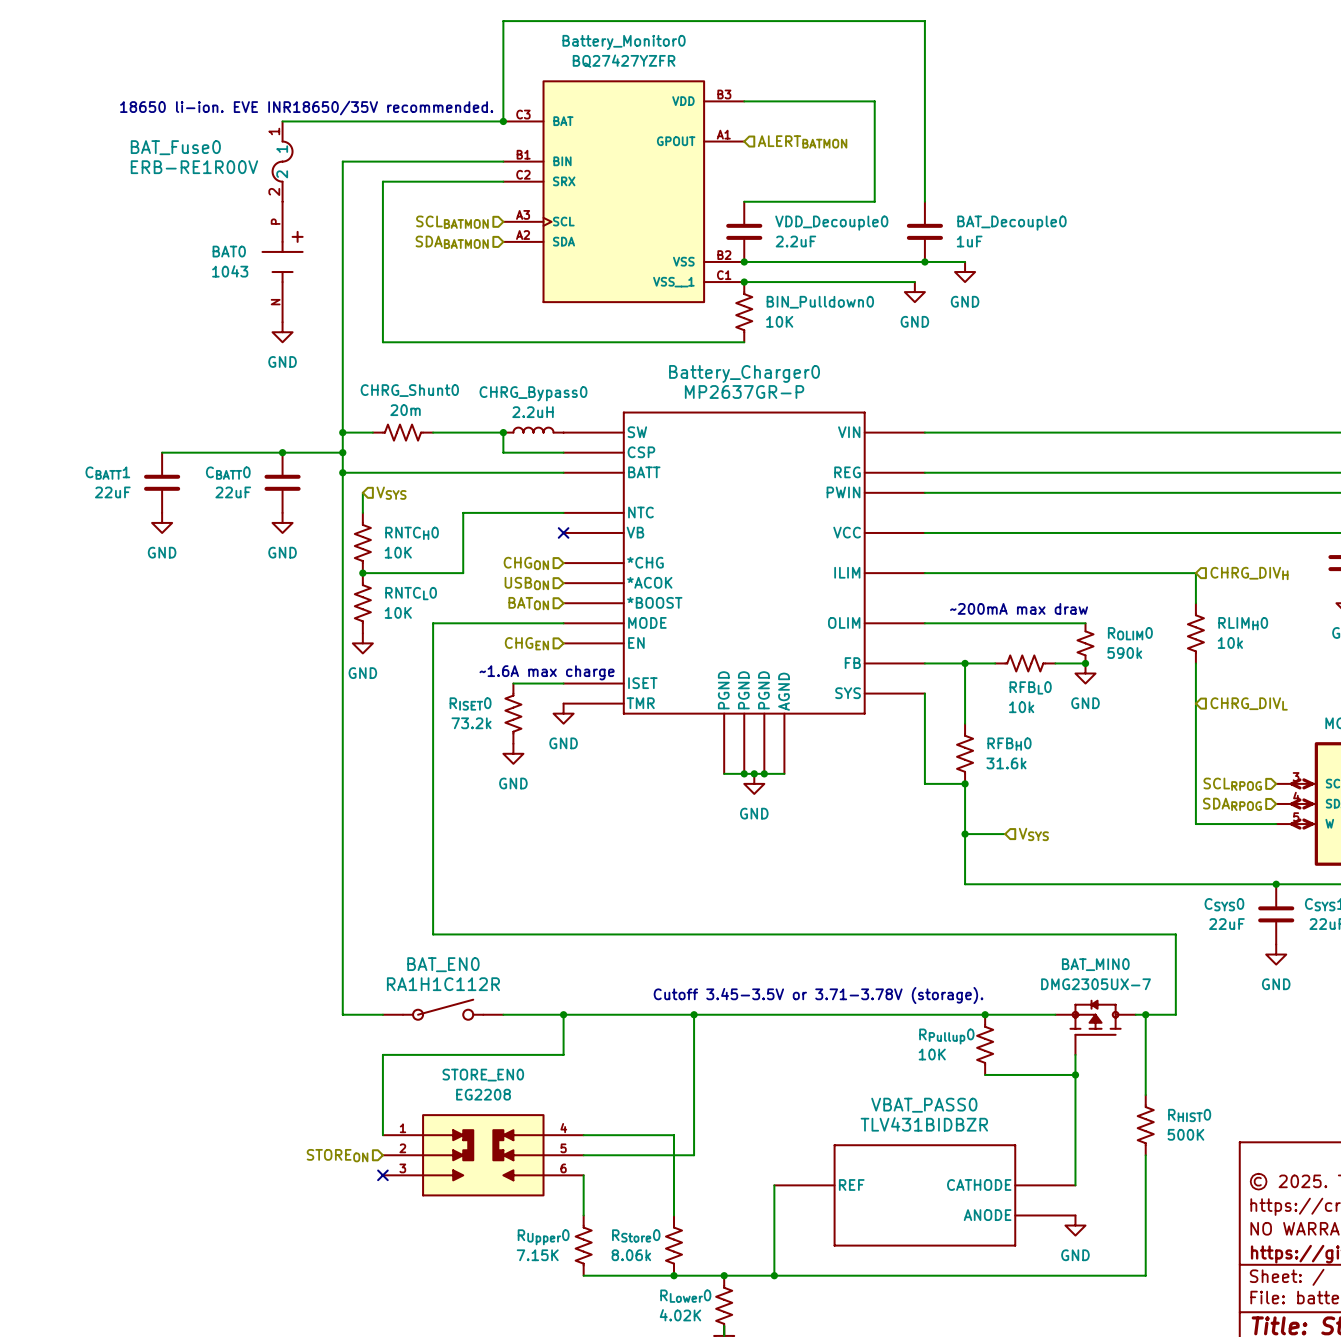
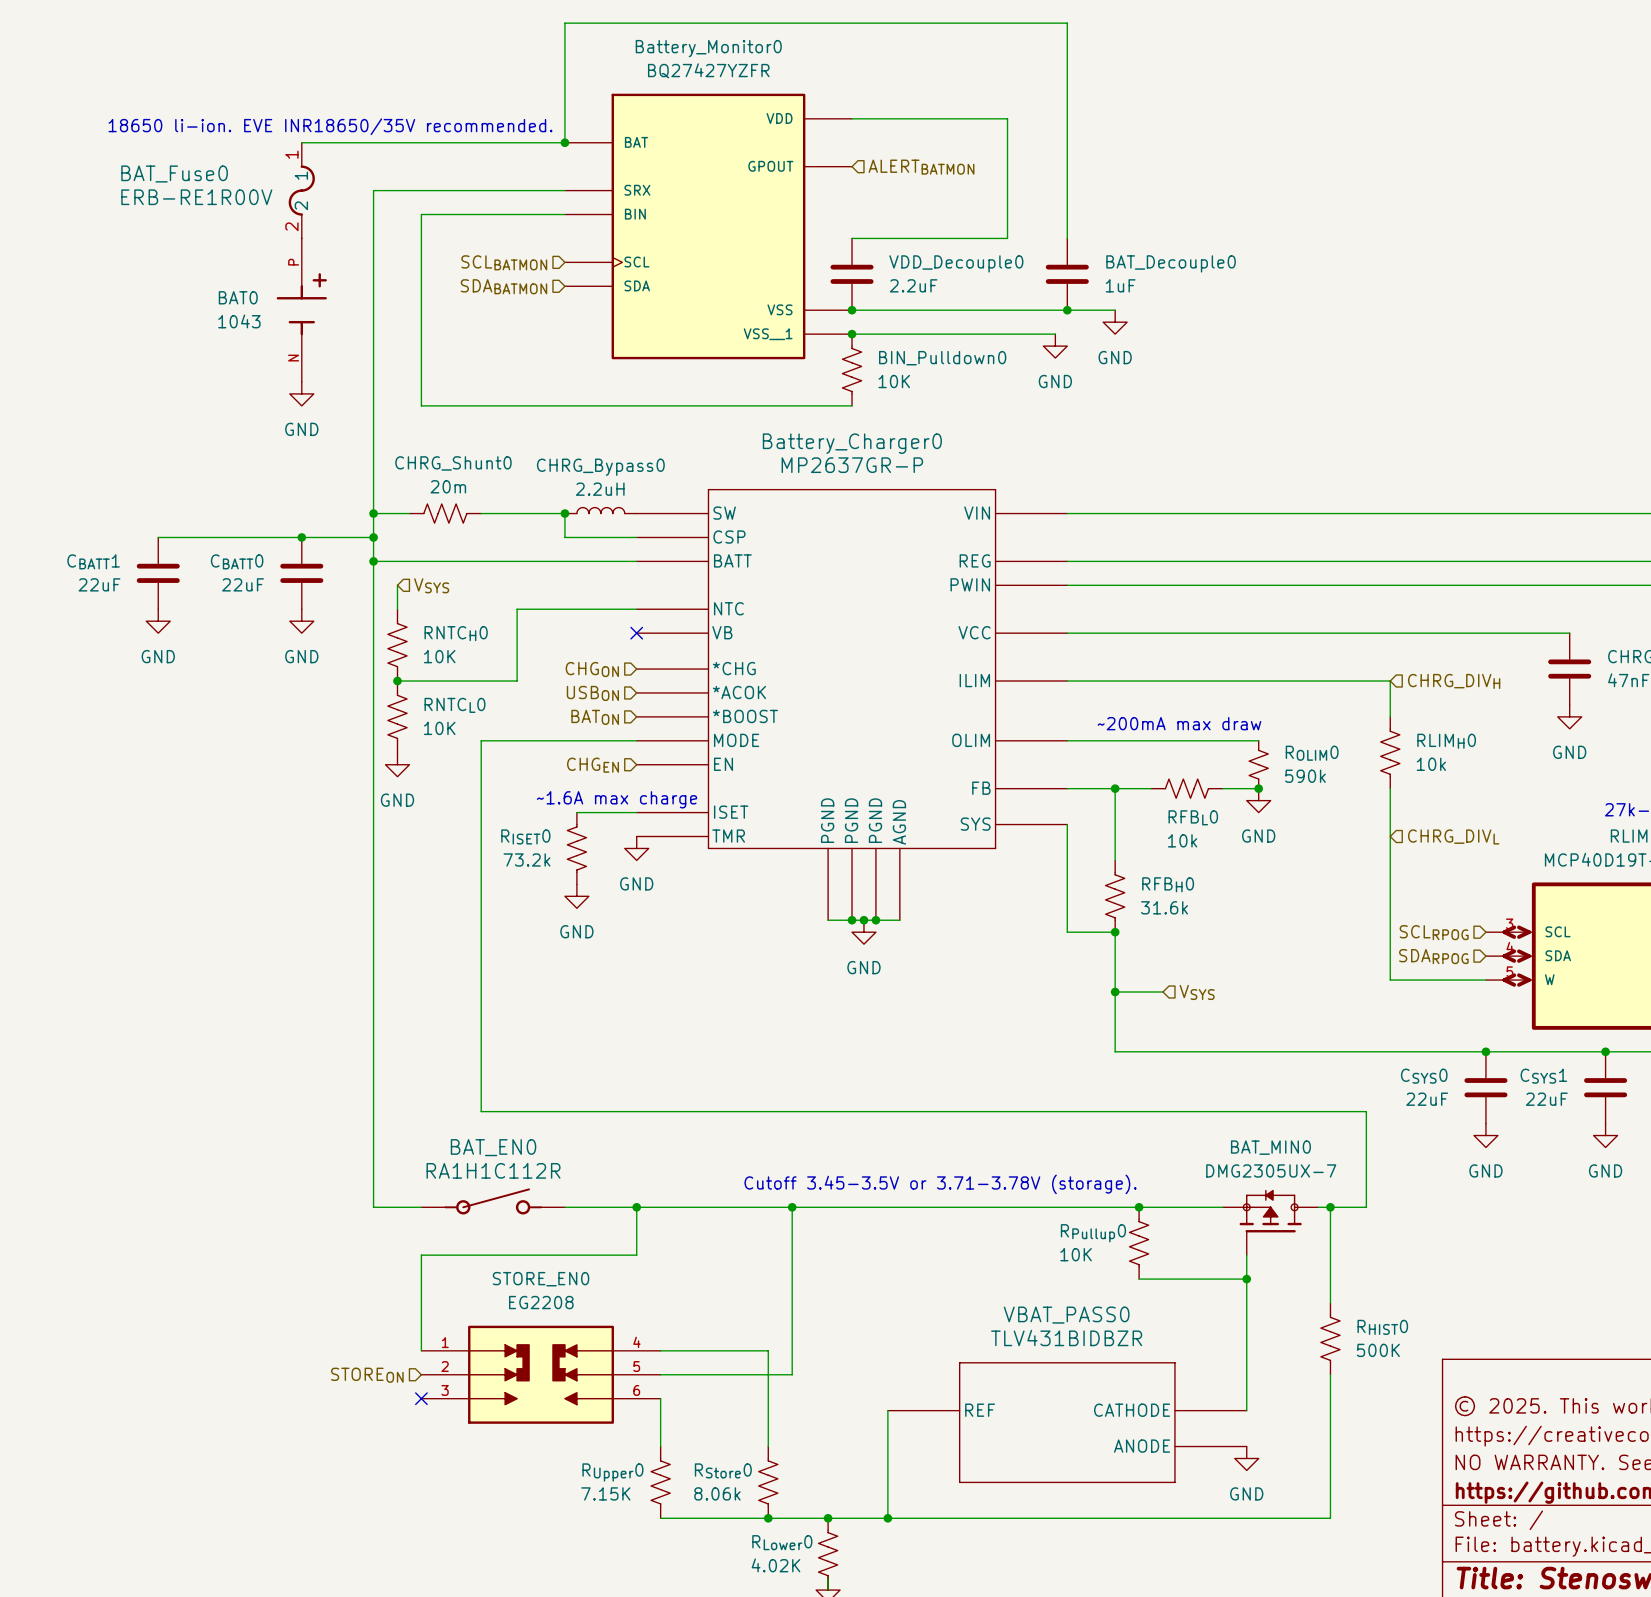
Battery_Monitor0 symbol: [503, 80, 745, 304] -> [564, 93, 853, 360]

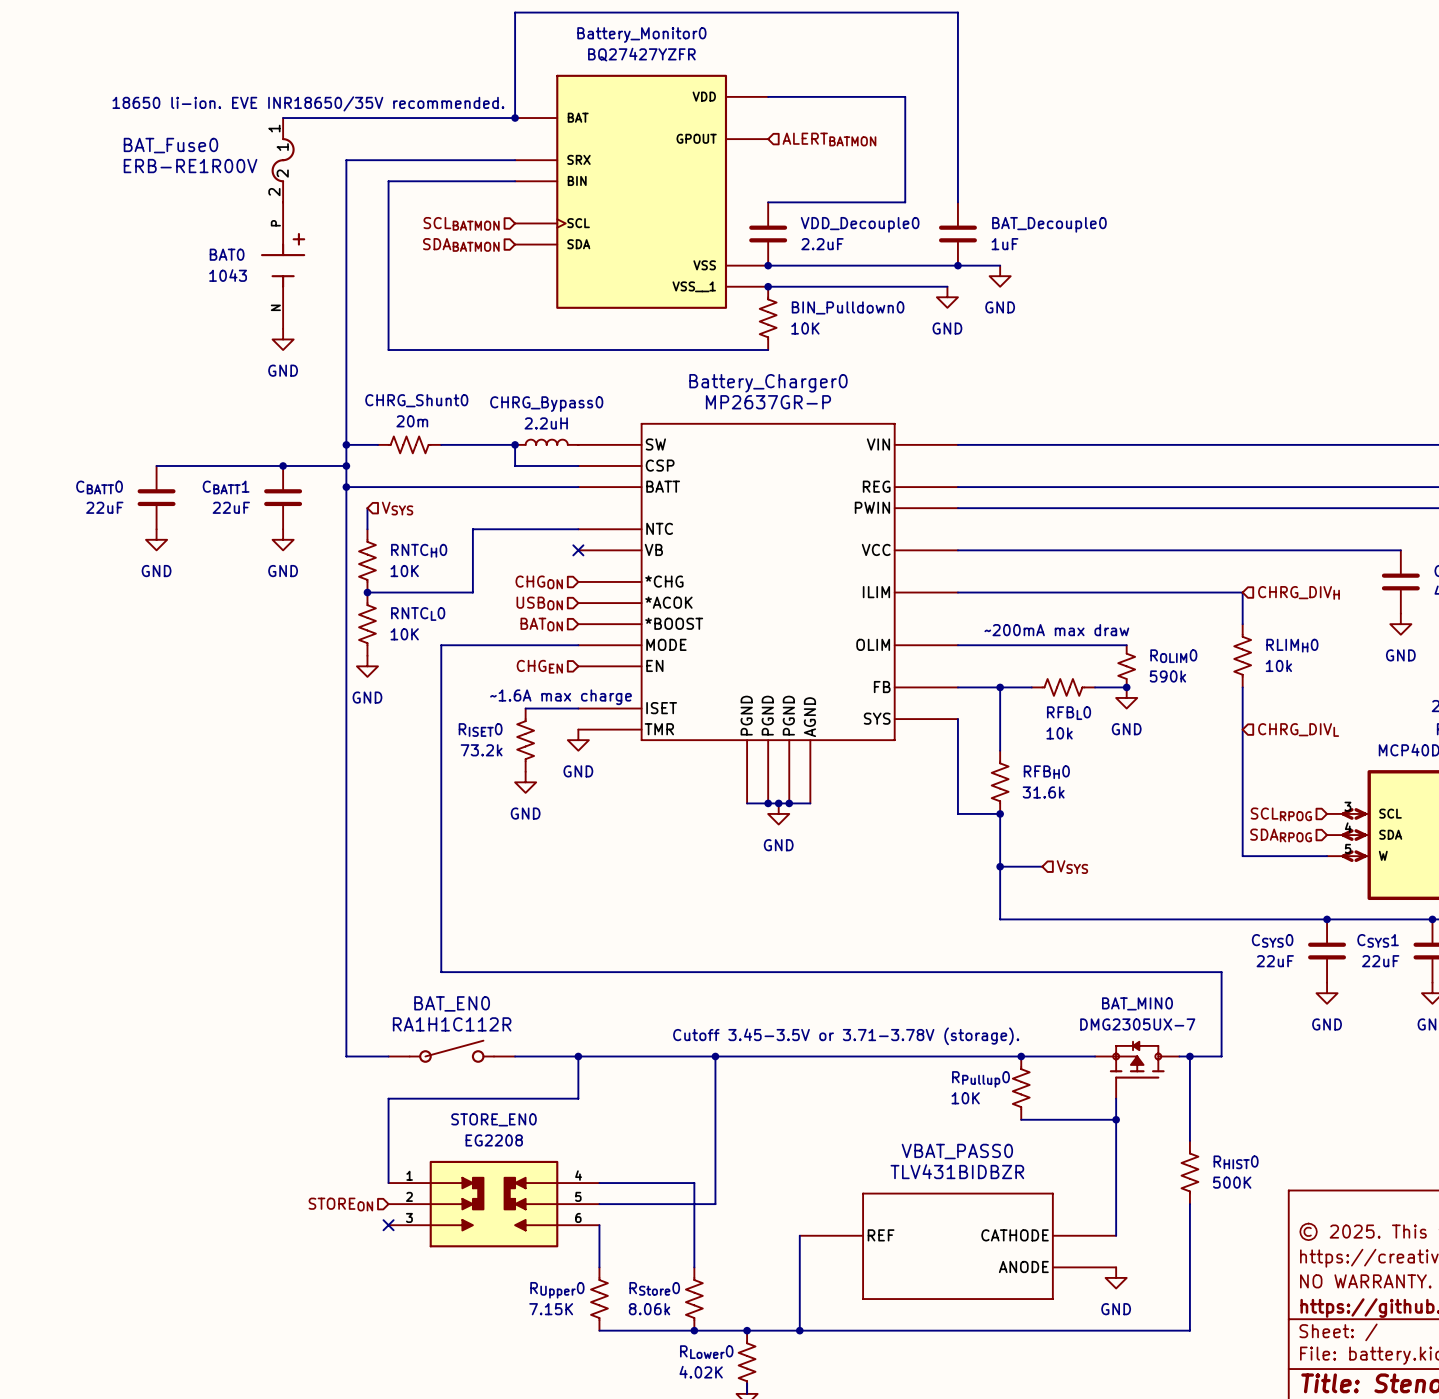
CBATT1 name: CBATT1 (93, 561) -> CBATT0 (99, 487)
CBATT0 name: CBATT0 (237, 561) -> CBATT1 (226, 487)

